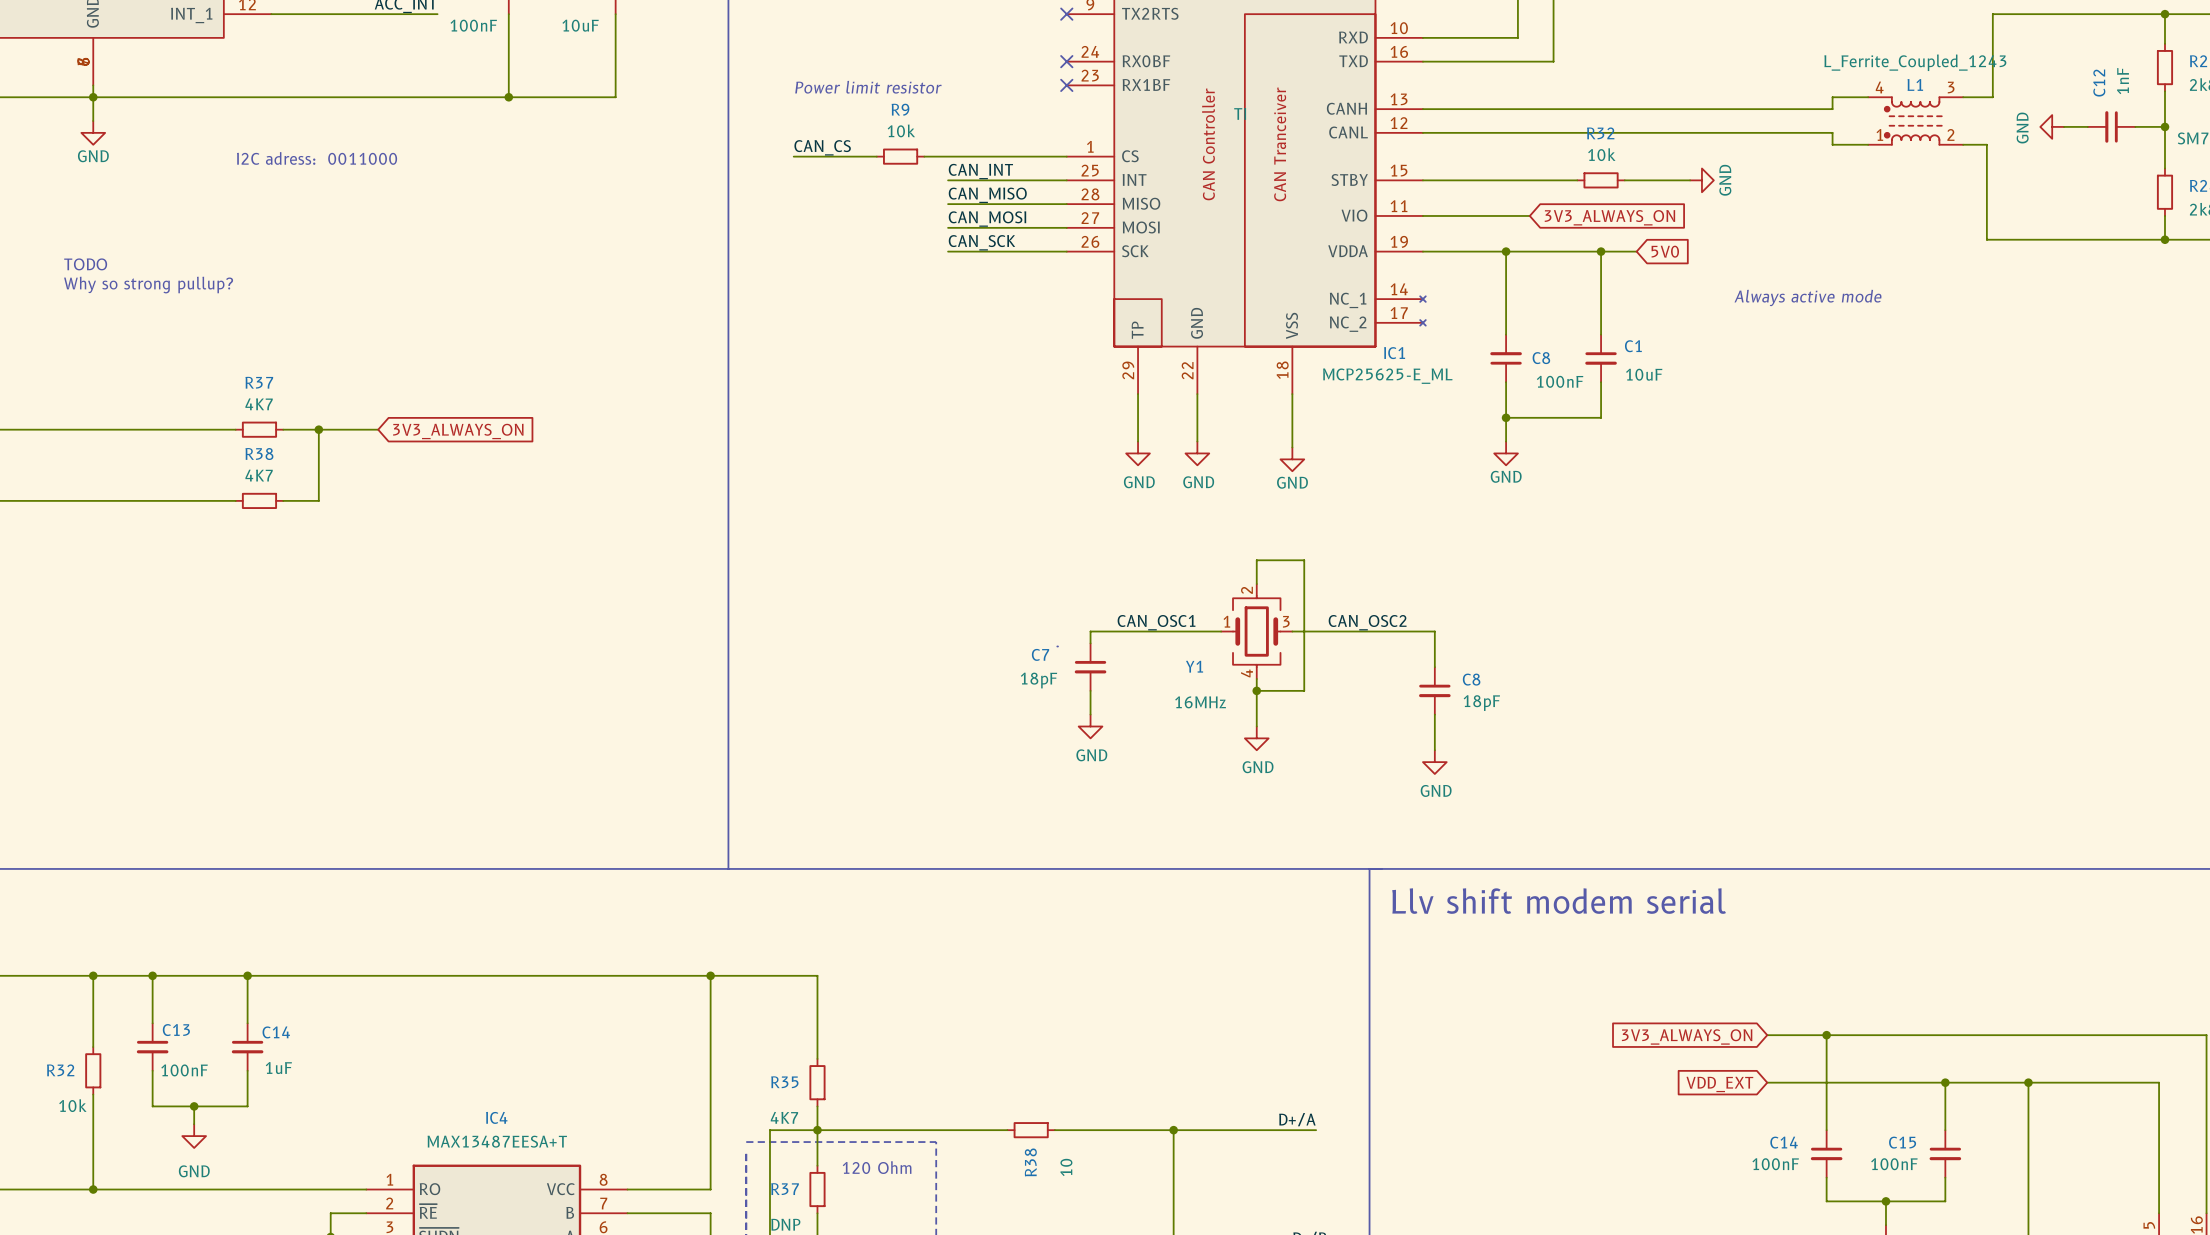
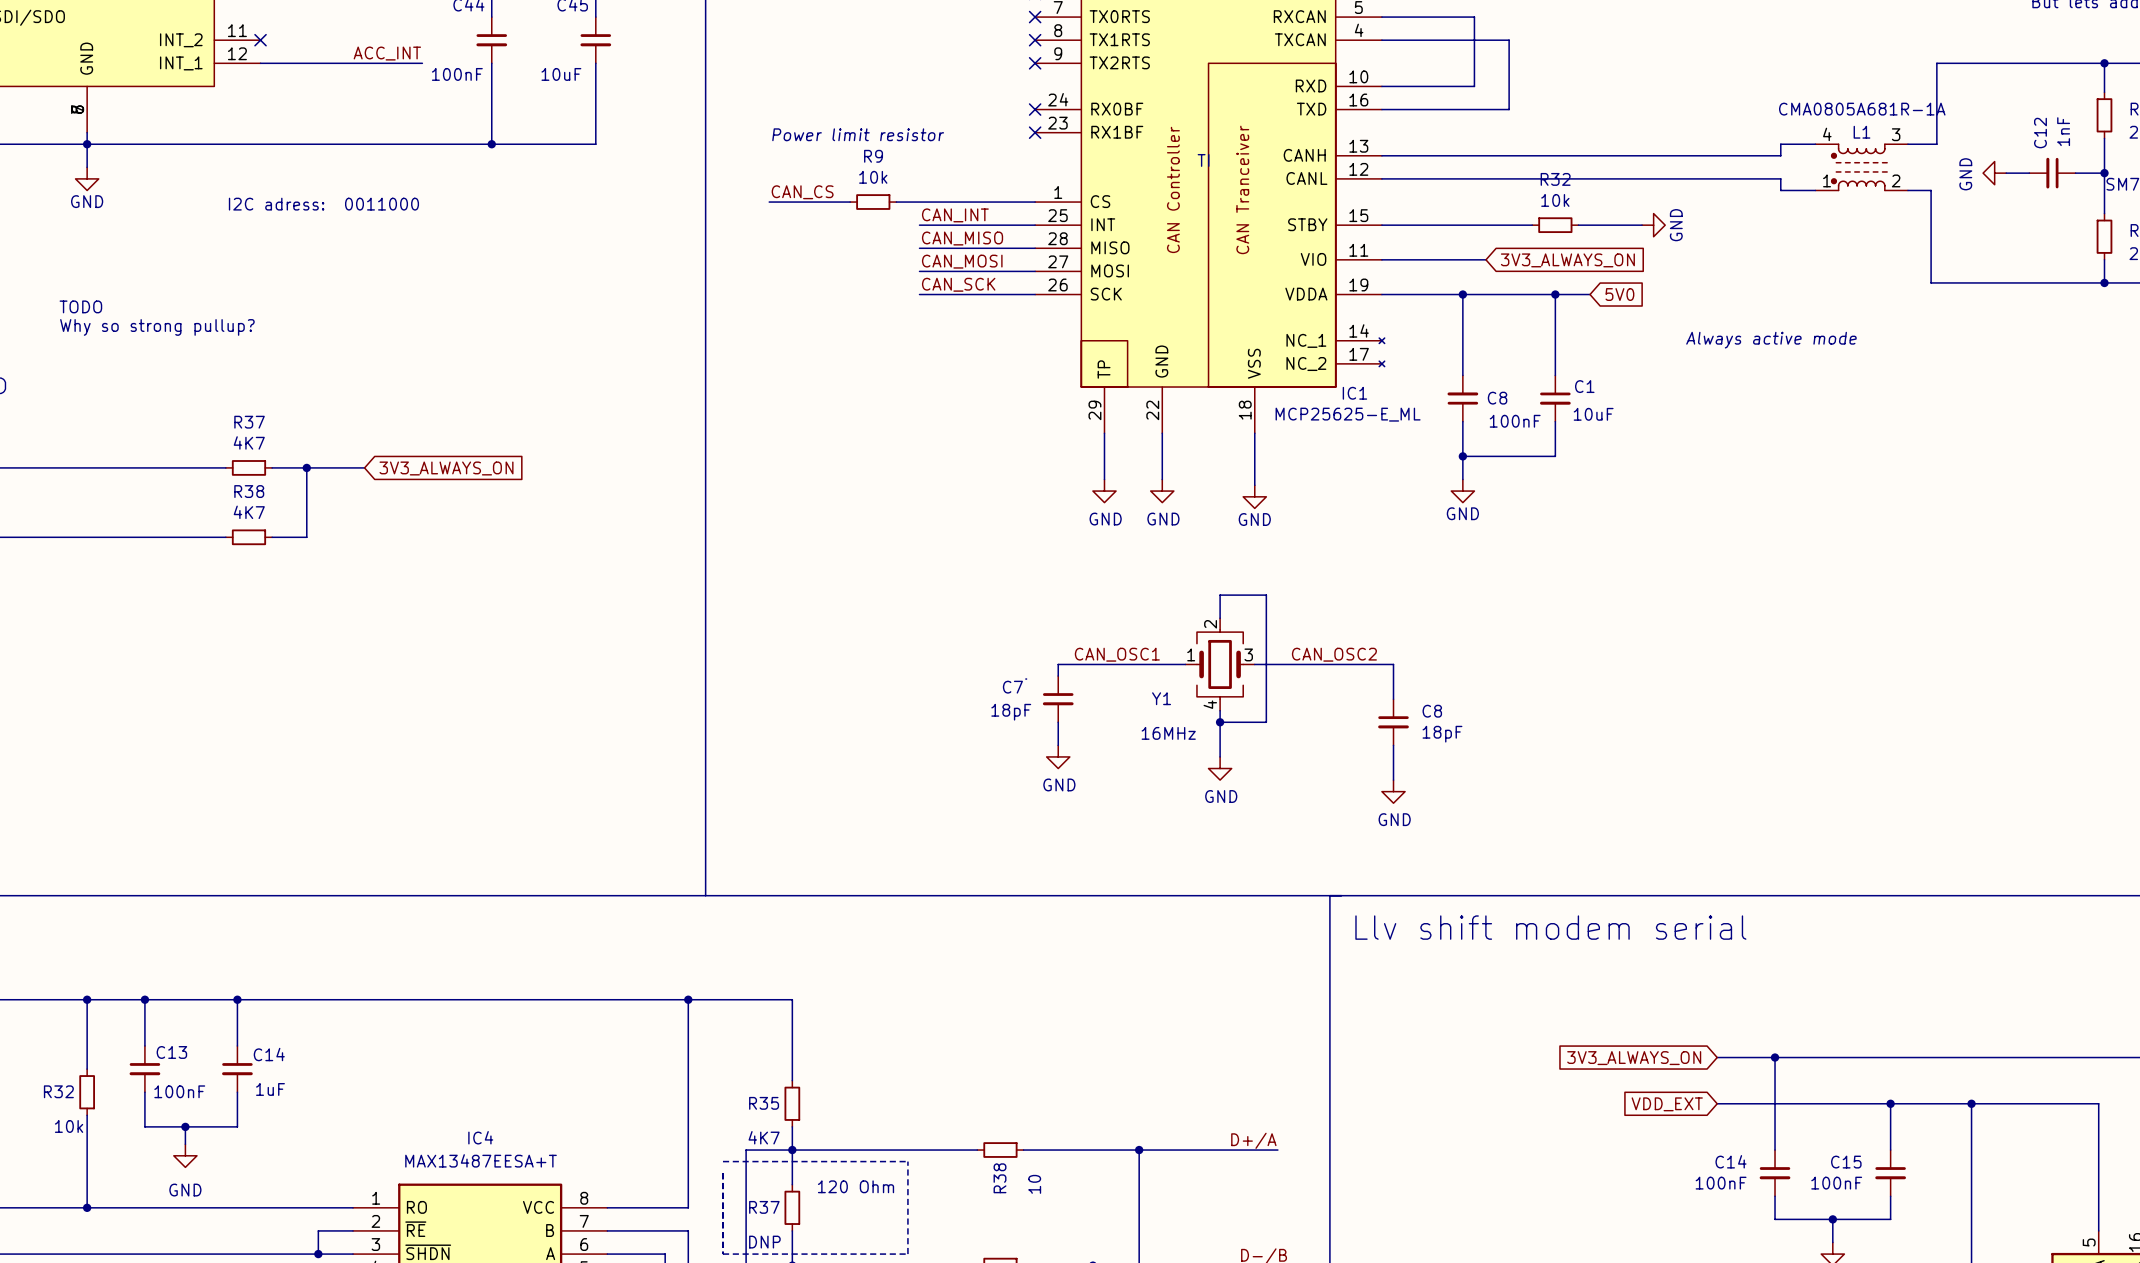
L1 value: L_Ferrite_Coupled_1243 (1915, 62) -> CMA0805A681R-1A (1862, 109)

